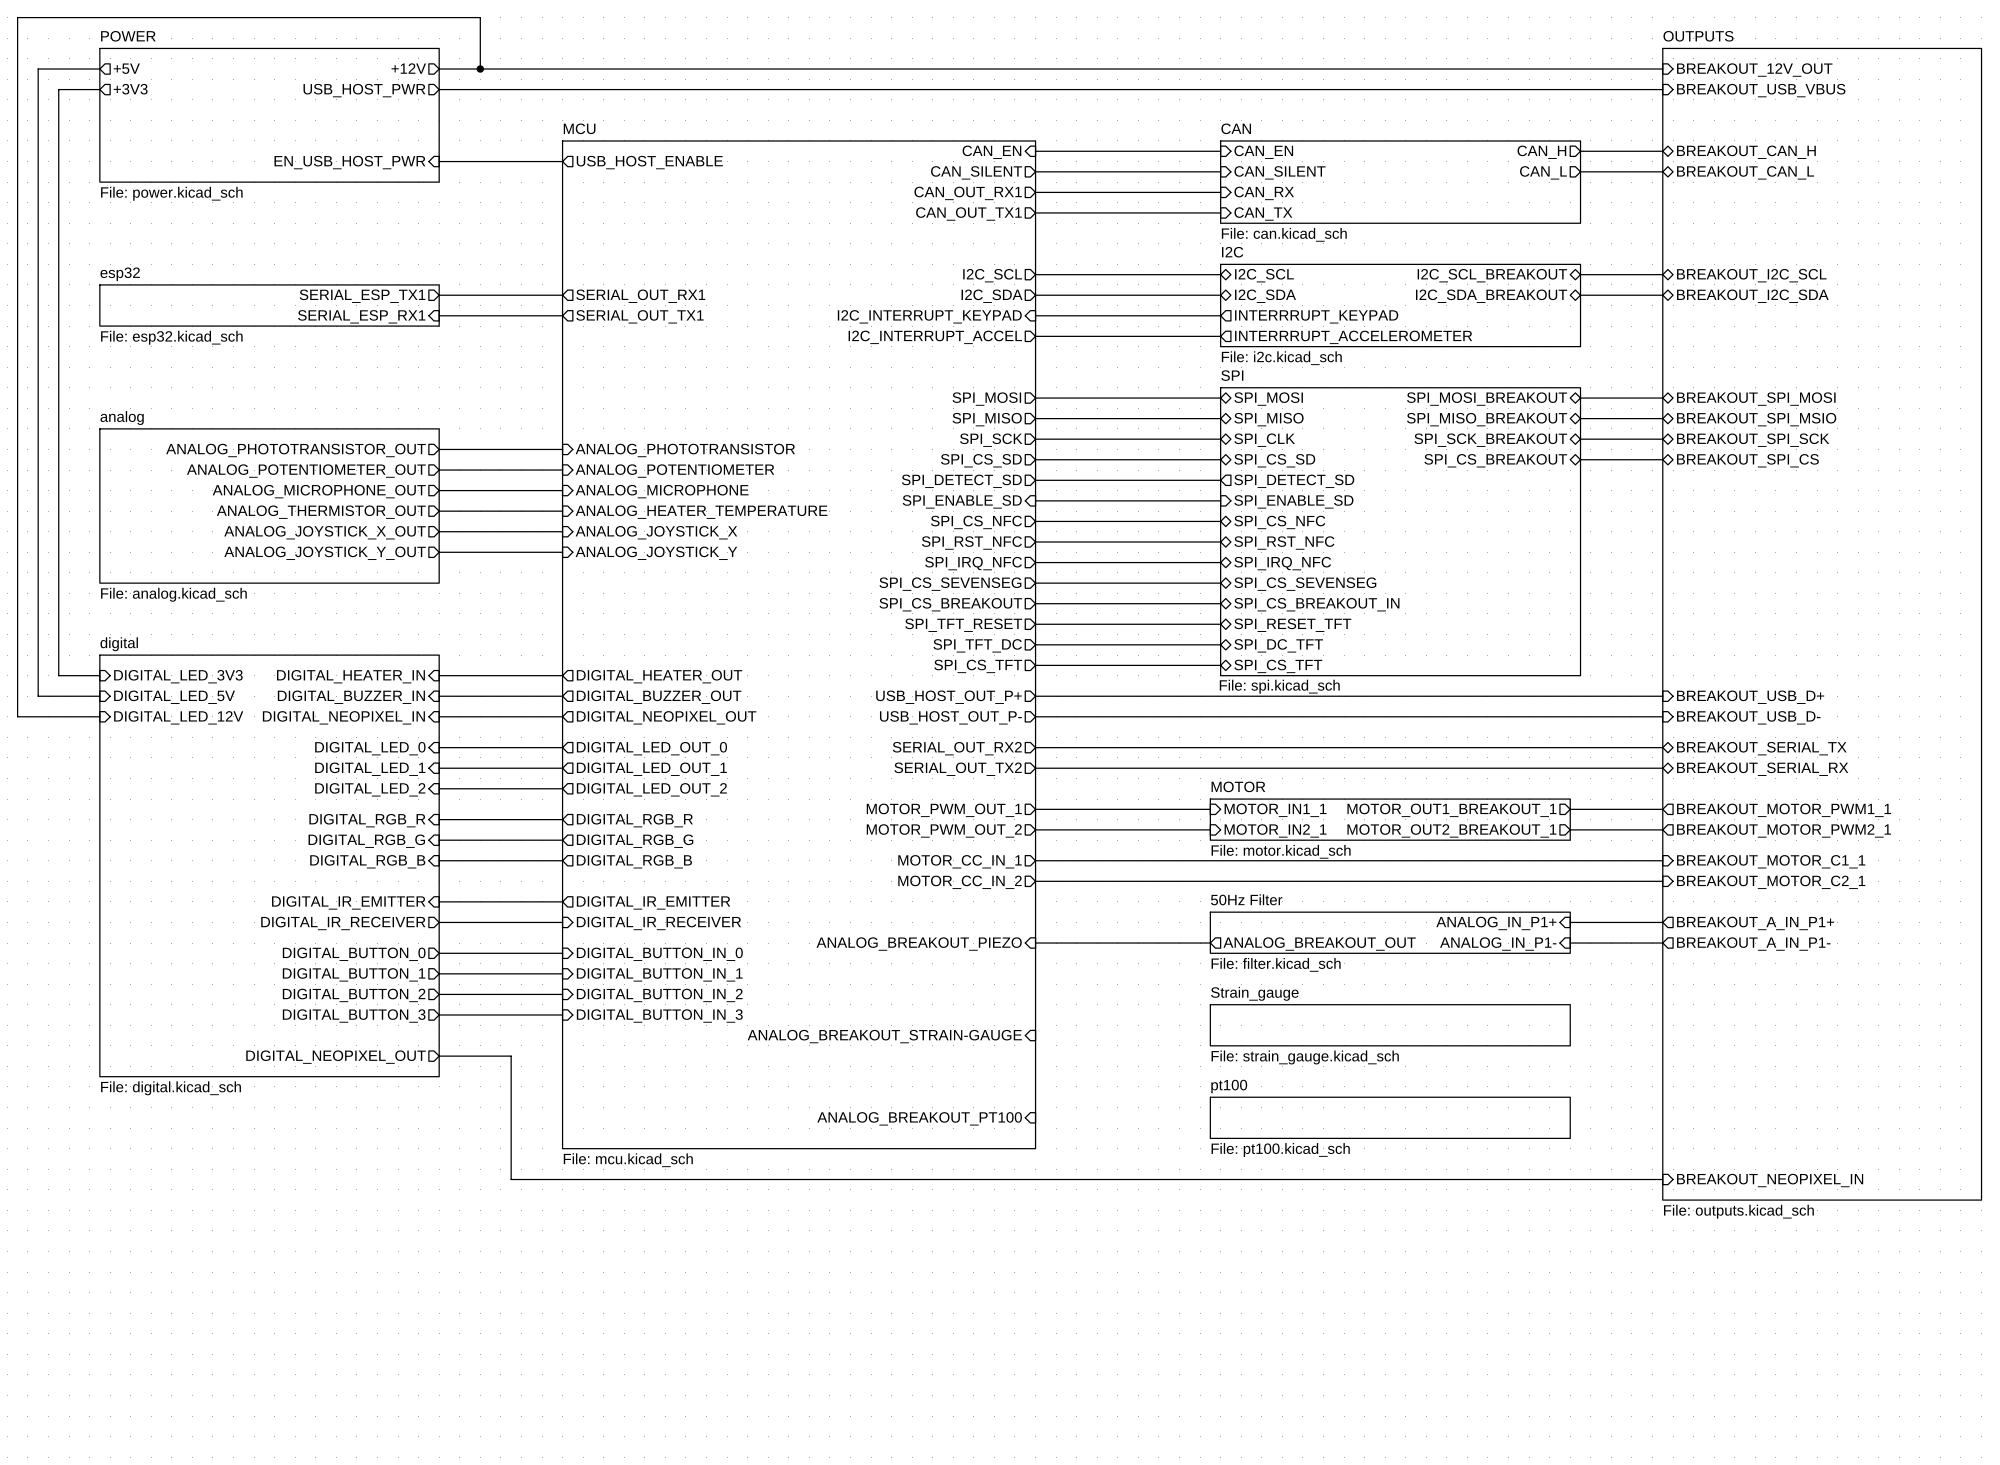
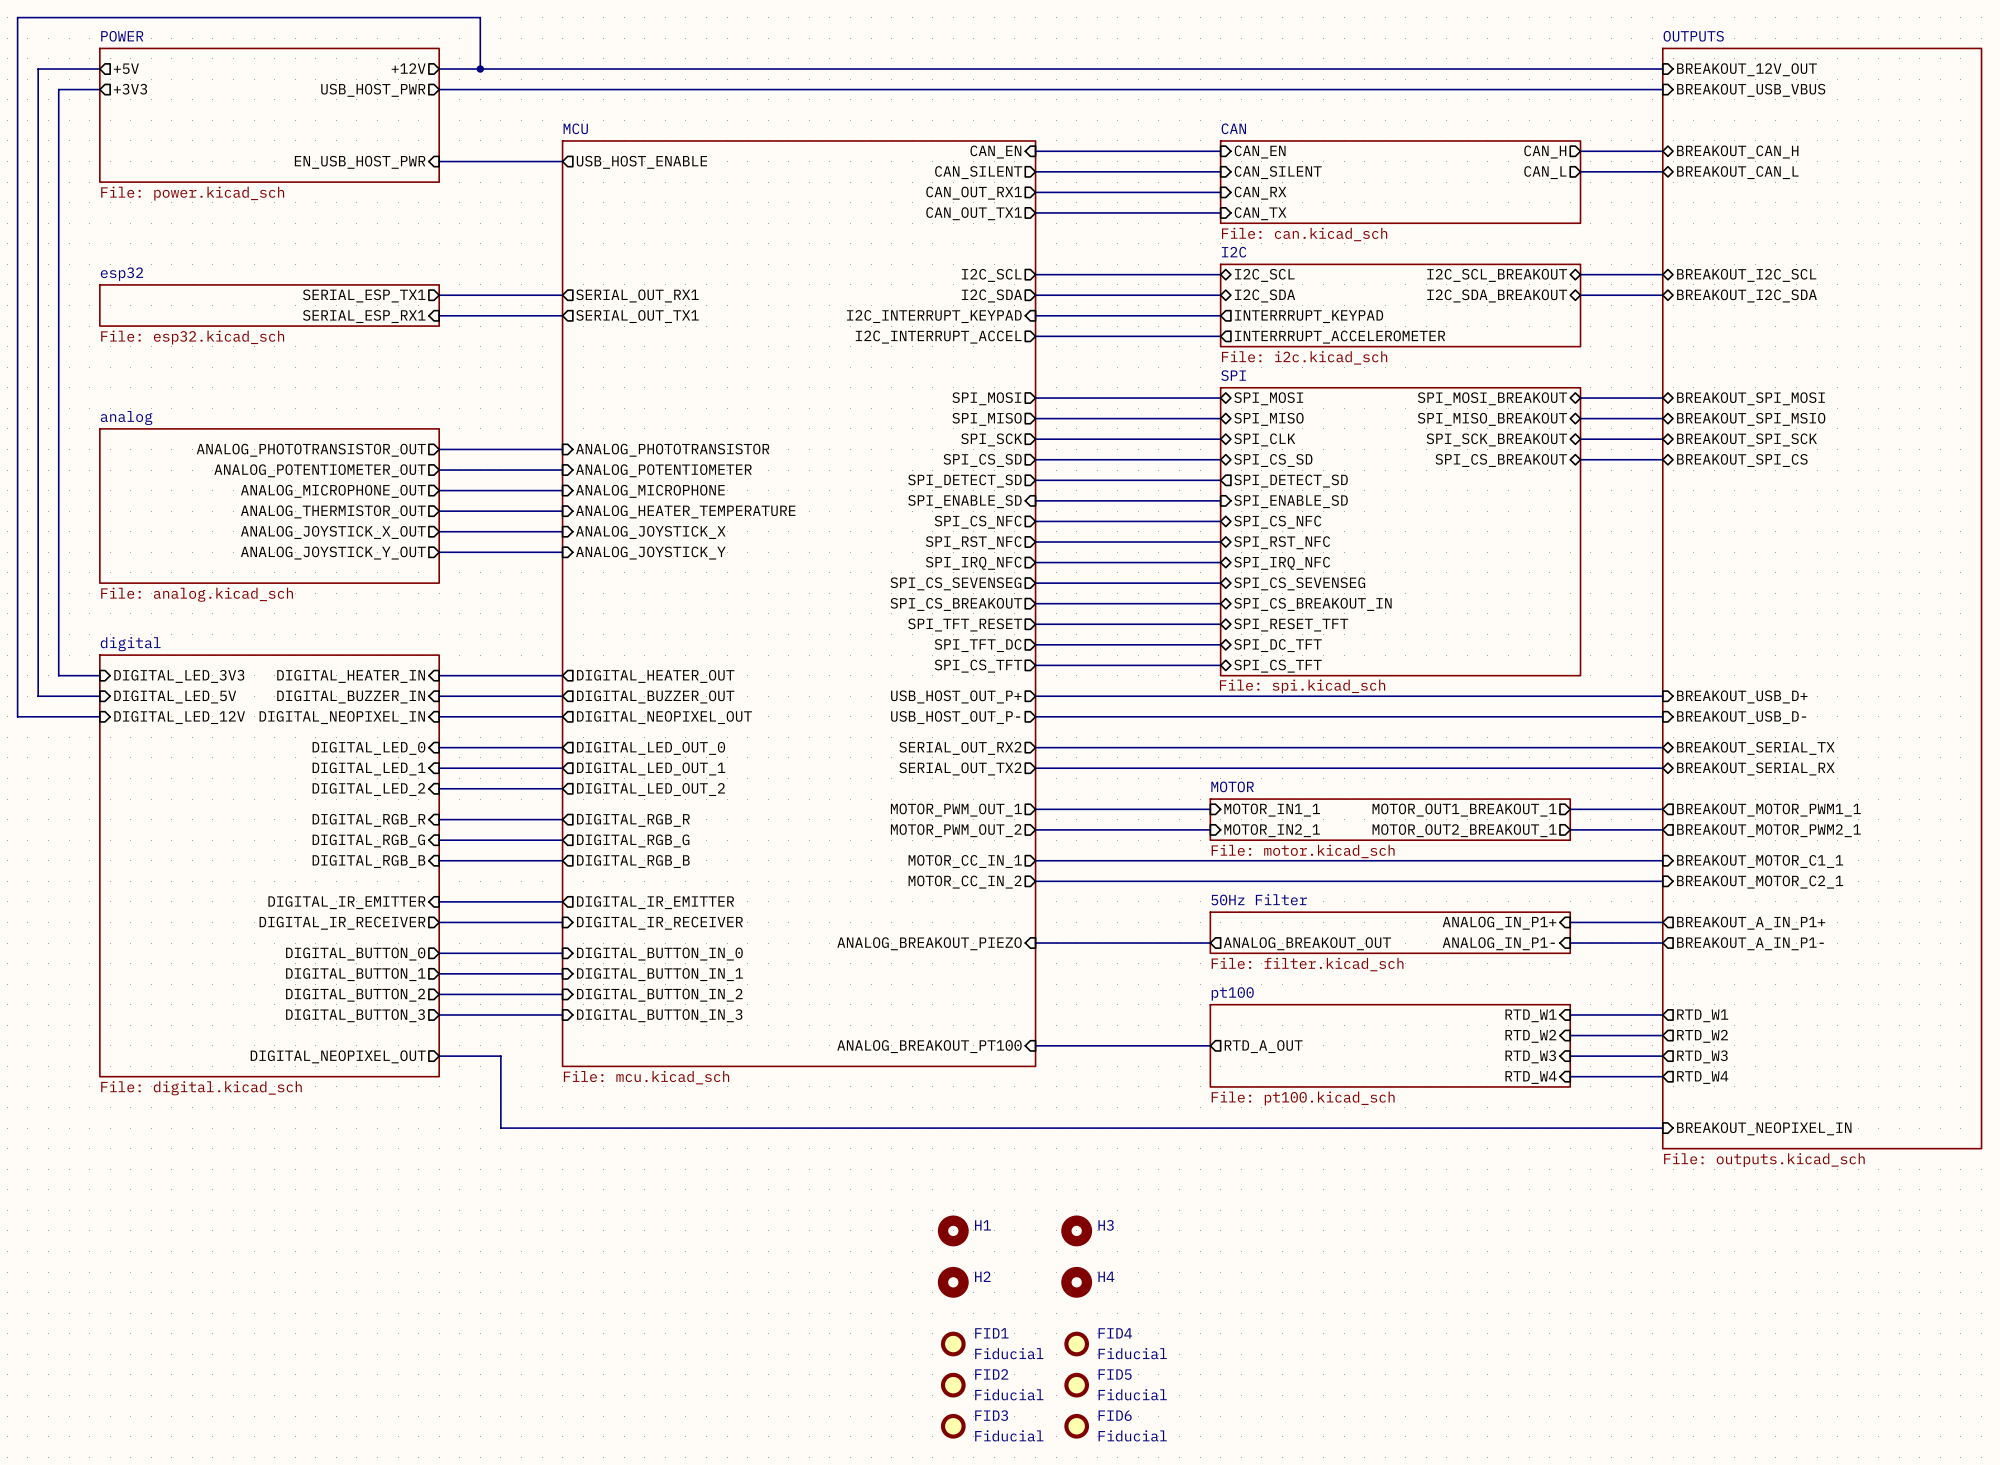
sheet OUTPUTS: none -> File: outputs.kicad_sch (1822, 598)
sheet MCU: none -> File: mcu.kicad_sch (799, 603)
sheet OUTPUTS: File: outputs.kicad_sch (1822, 624) -> none
sheet MCU: File: mcu.kicad_sch (799, 644) -> none
wire: none -> (1570, 1014) (1662, 1014)
sheet pin: none -> RTD_W1 (1530, 1015)
sheet pin: none -> RTD_W1 (1702, 1015)
sheet Strain_gauge: File: strain_gauge.kicad_sch (1390, 1025) -> none
wire: none -> (1570, 1035) (1662, 1035)
sheet pin: ANALOG_BREAKOUT_STRAIN-GAUGE (884, 1036) -> none
sheet pin: none -> RTD_W2 (1530, 1036)
sheet pin: none -> RTD_W2 (1702, 1036)
wire: none -> (1035, 1045) (1210, 1045)
sheet pin: none -> RTD_A_OUT (1263, 1046)
wire: (500, 1056) (511, 1056) (511, 1179) (1662, 1179) -> (500, 1056) (500, 1128) (1662, 1128)
wire: none -> (1570, 1056) (1662, 1056)
sheet pin: none -> RTD_W3 (1530, 1056)
sheet pin: none -> RTD_W3 (1702, 1056)
wire: none -> (1570, 1076) (1662, 1076)
sheet pin: none -> RTD_W4 (1531, 1077)
sheet pin: none -> RTD_W4 (1702, 1077)
sheet pt100 name position: pt100 (1229, 1086) -> pt100 (1232, 993)
sheet pt100 shape: [1209, 1096, 1571, 1139] -> [1209, 1004, 1571, 1088]
sheet pin position: ANALOG_BREAKOUT_PT100 (919, 1118) -> ANALOG_BREAKOUT_PT100 (929, 1046)
sheet pt100 value position: File: pt100.kicad_sch (1280, 1150) -> File: pt100.kicad_sch (1303, 1098)
sheet pin position: BREAKOUT_NEOPIXEL_IN (1770, 1180) -> BREAKOUT_NEOPIXEL_IN (1764, 1128)
H1: none -> (953, 1230)
H3: none -> (1076, 1230)
H2: none -> (953, 1282)
H4: none -> (1076, 1282)
FID1: none -> Fiducial (953, 1344)
FID4: none -> Fiducial (1076, 1344)
FID2: none -> Fiducial (953, 1385)
FID5: none -> Fiducial (1076, 1385)
FID3: none -> Fiducial (953, 1426)
FID6: none -> Fiducial (1076, 1426)

